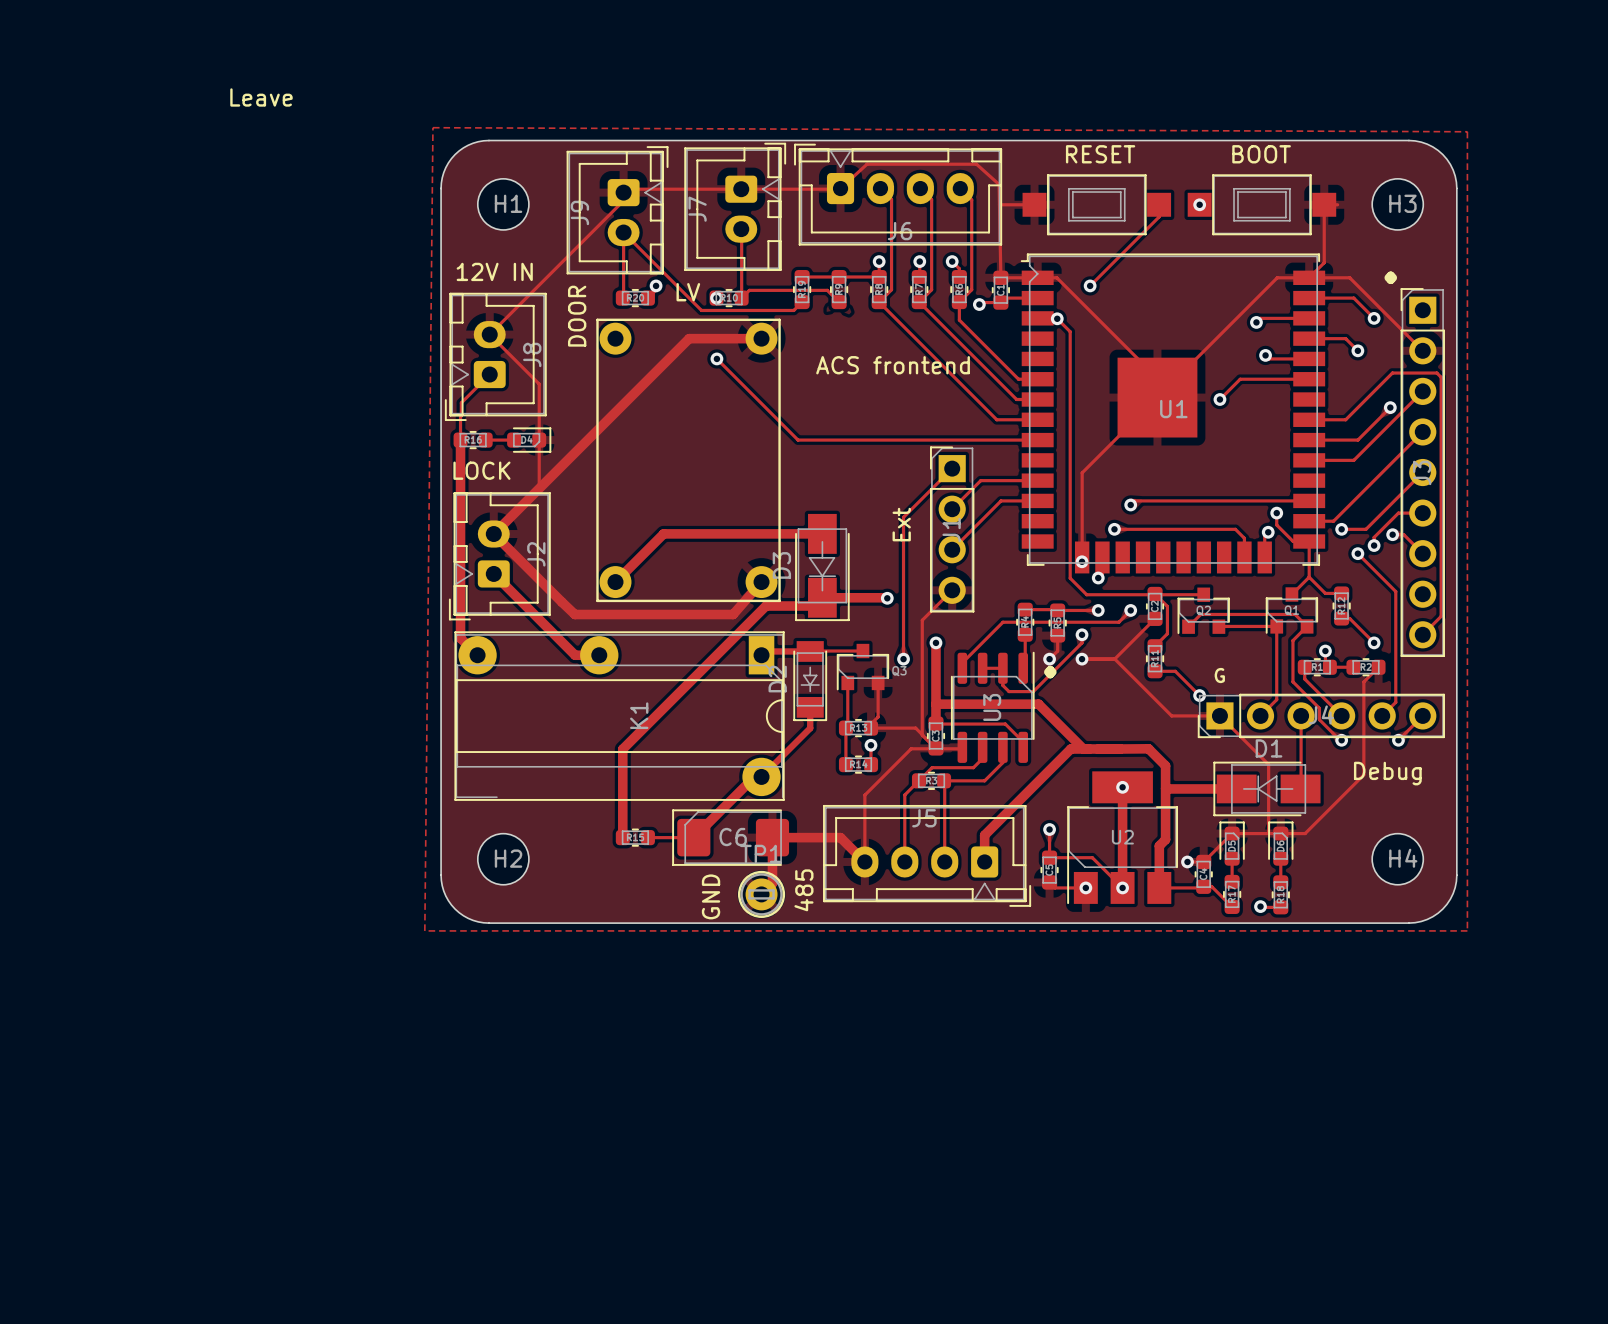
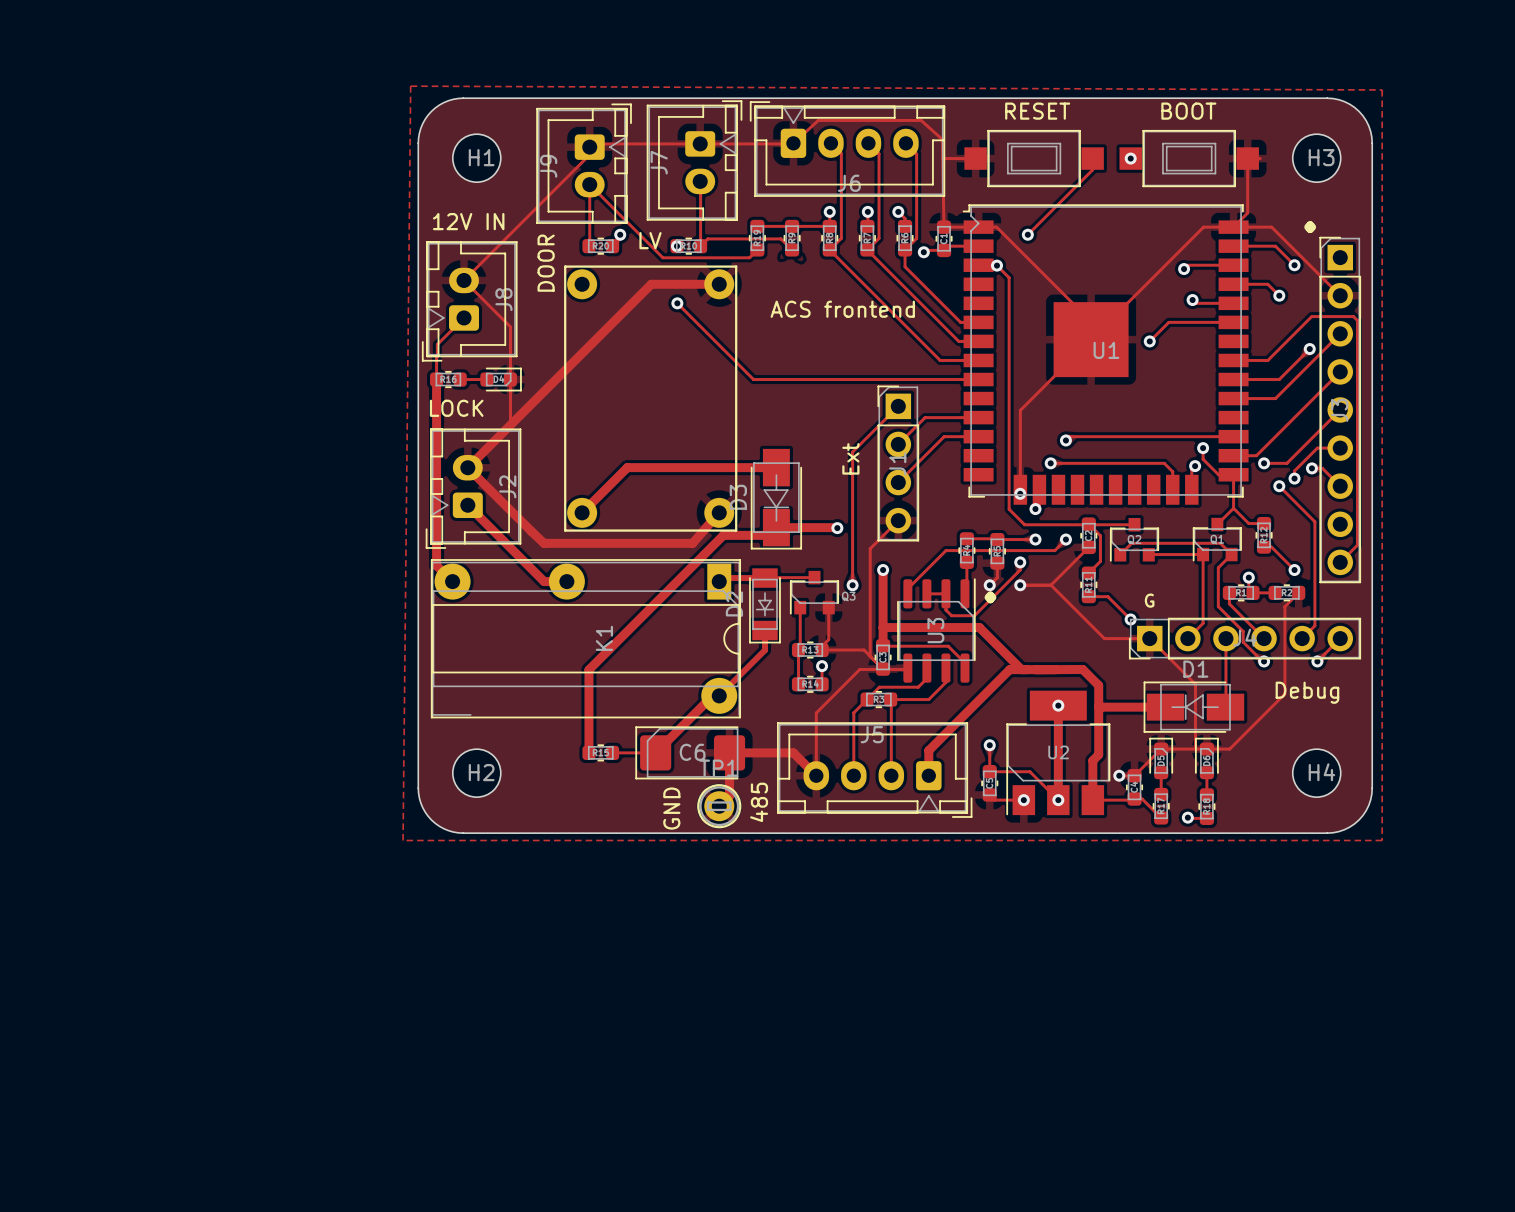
text: Leave (261, 97) -> none

